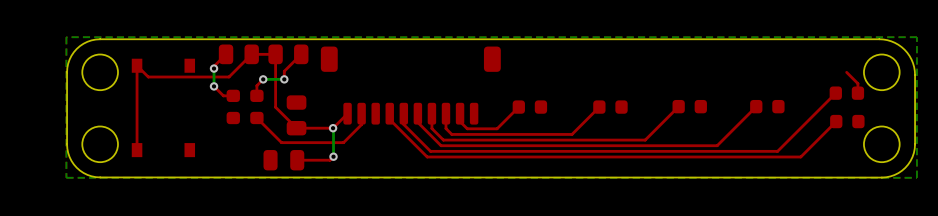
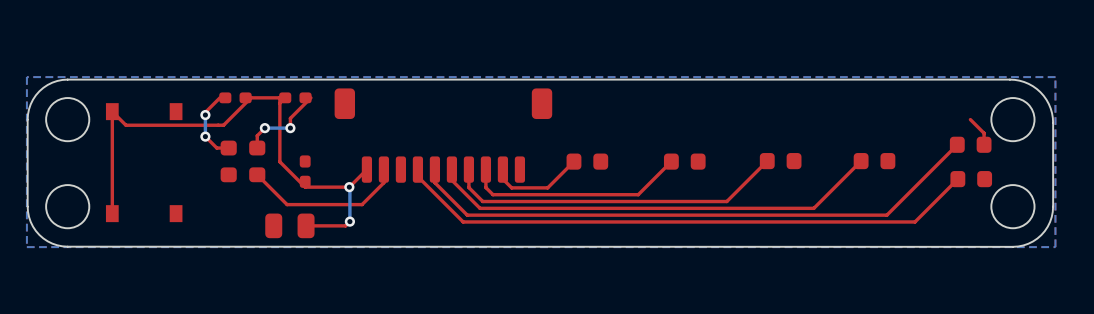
part footprint: [218, 44, 259, 65] -> [219, 92, 252, 104]
part footprint: [268, 44, 309, 65] -> [279, 92, 312, 104]
part footprint: [286, 95, 307, 136] -> [299, 155, 311, 188]

